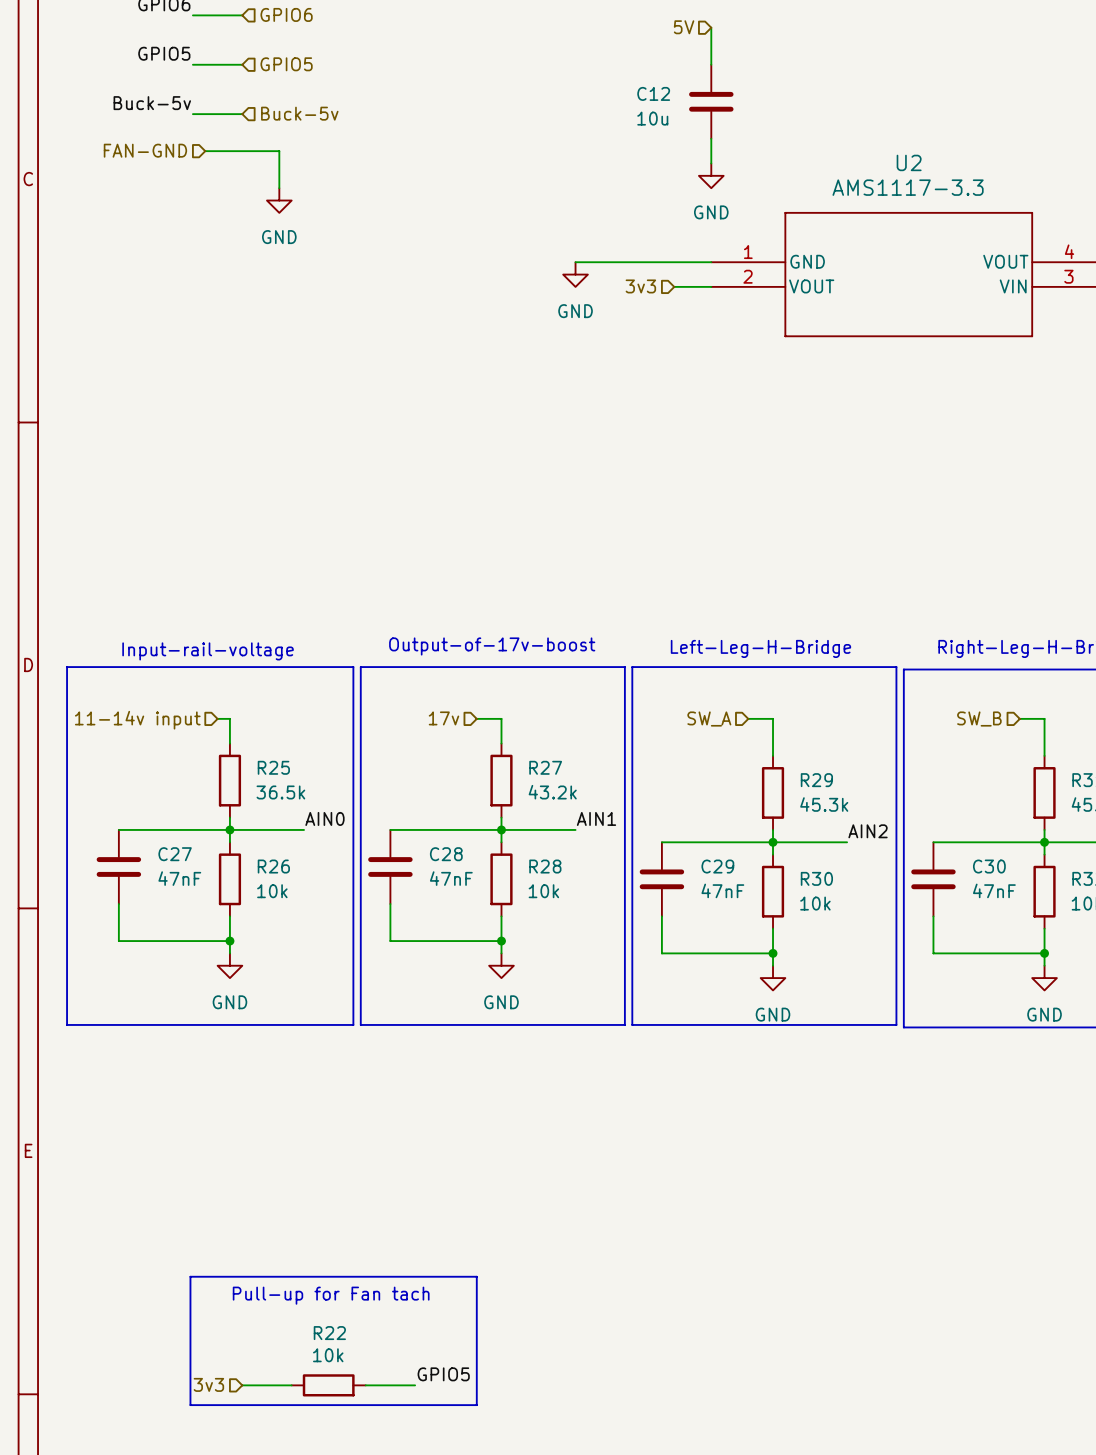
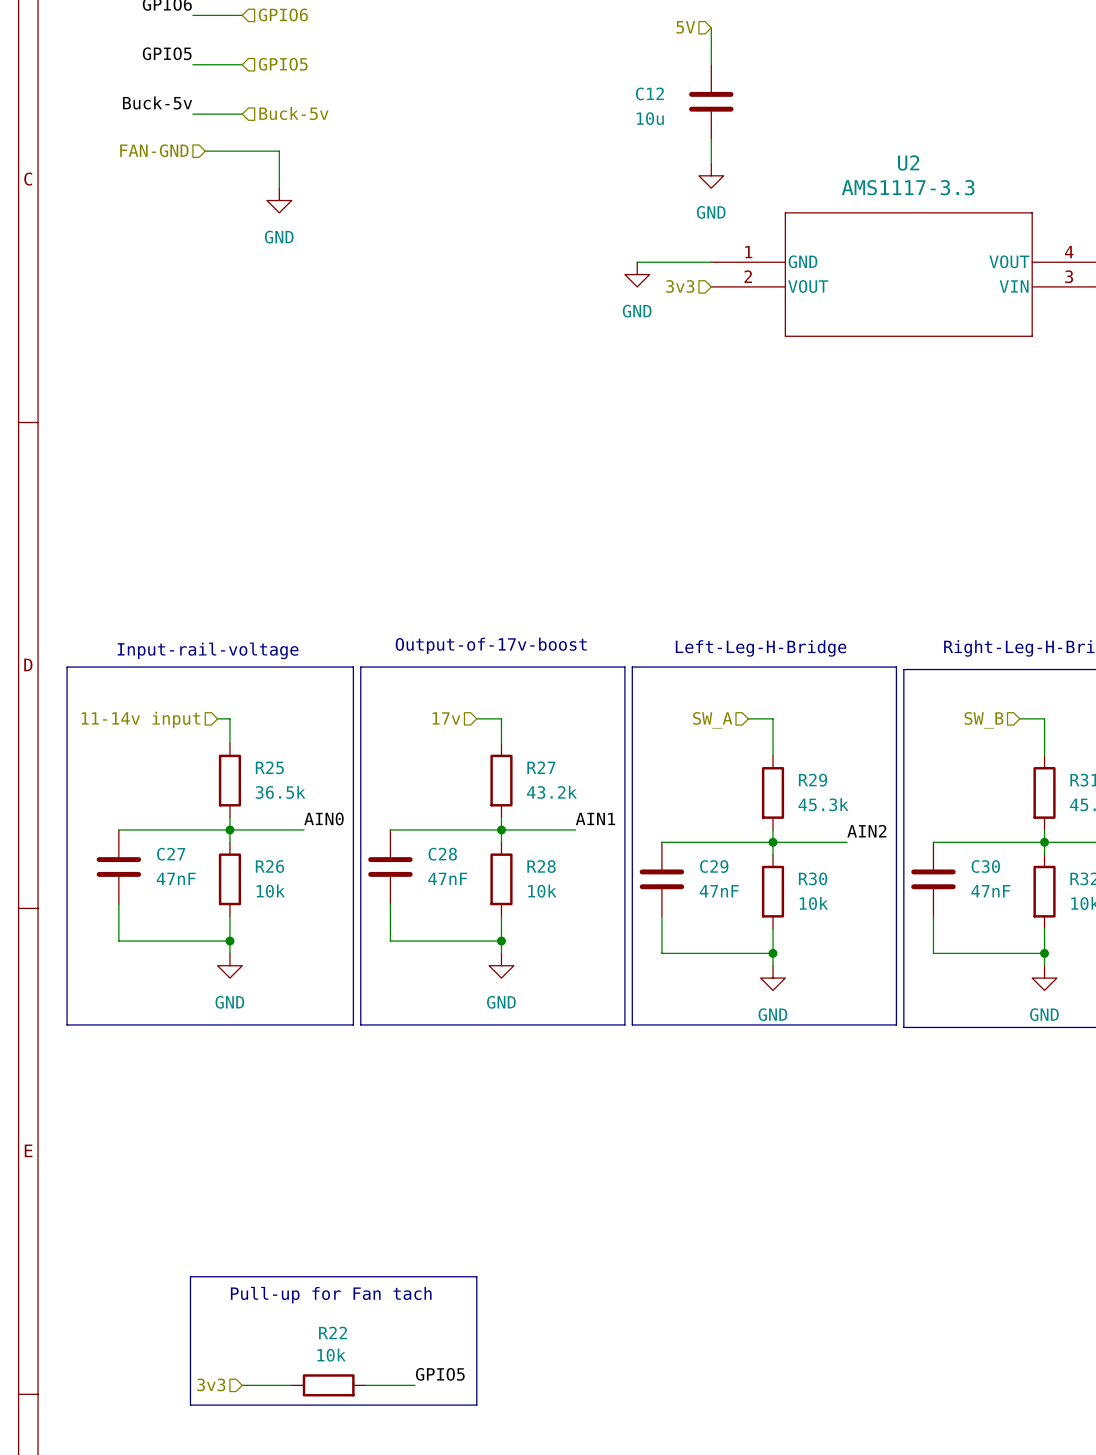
wire: (575, 262) (637, 262) -> none
power symbol position: GND (575, 274) -> GND (637, 274)
hierarchical label position: 3v3 (640, 286) -> 3v3 (680, 286)
wire: (674, 286) (711, 286) -> none

